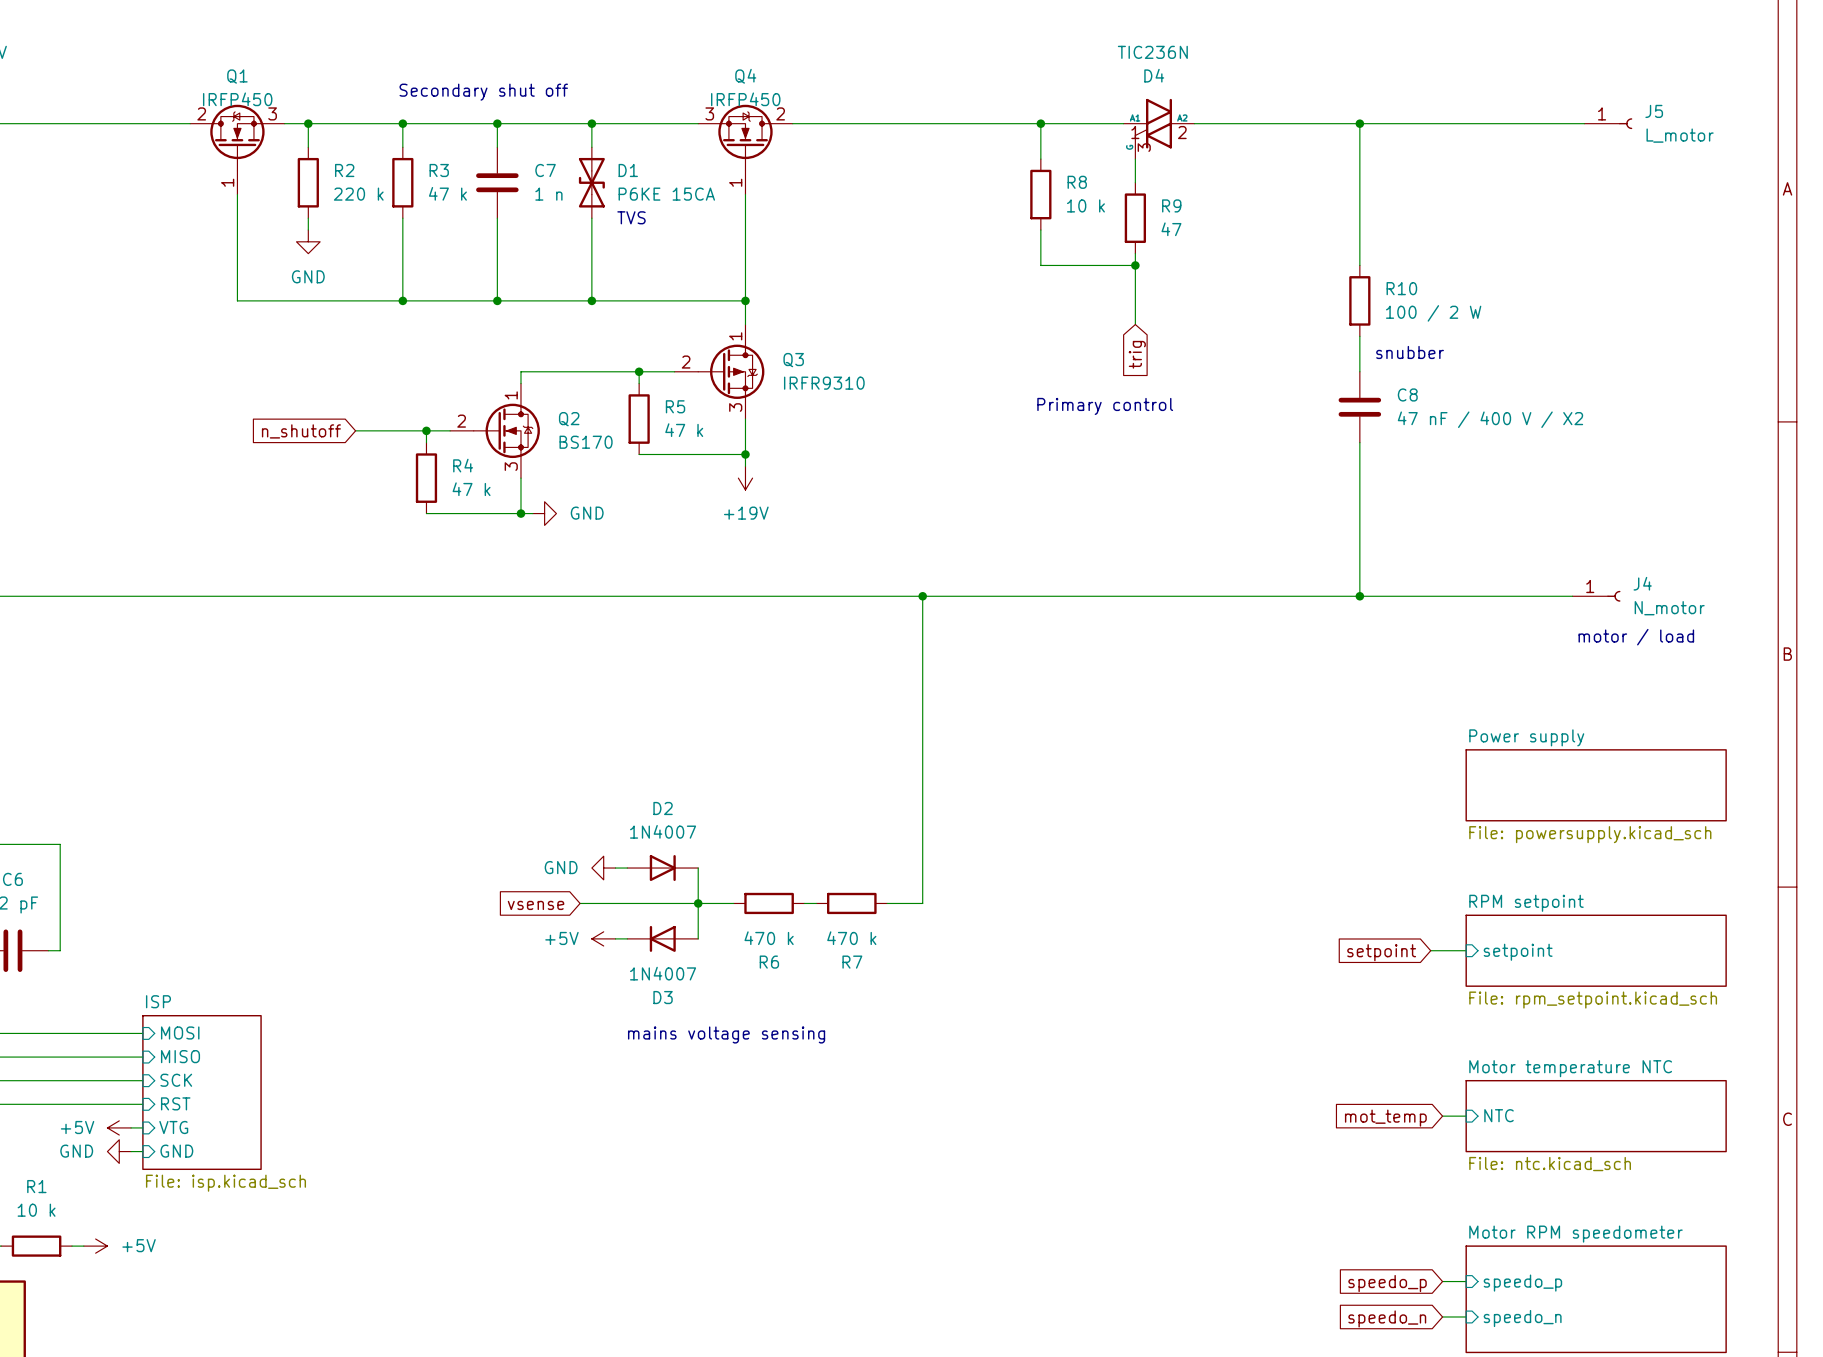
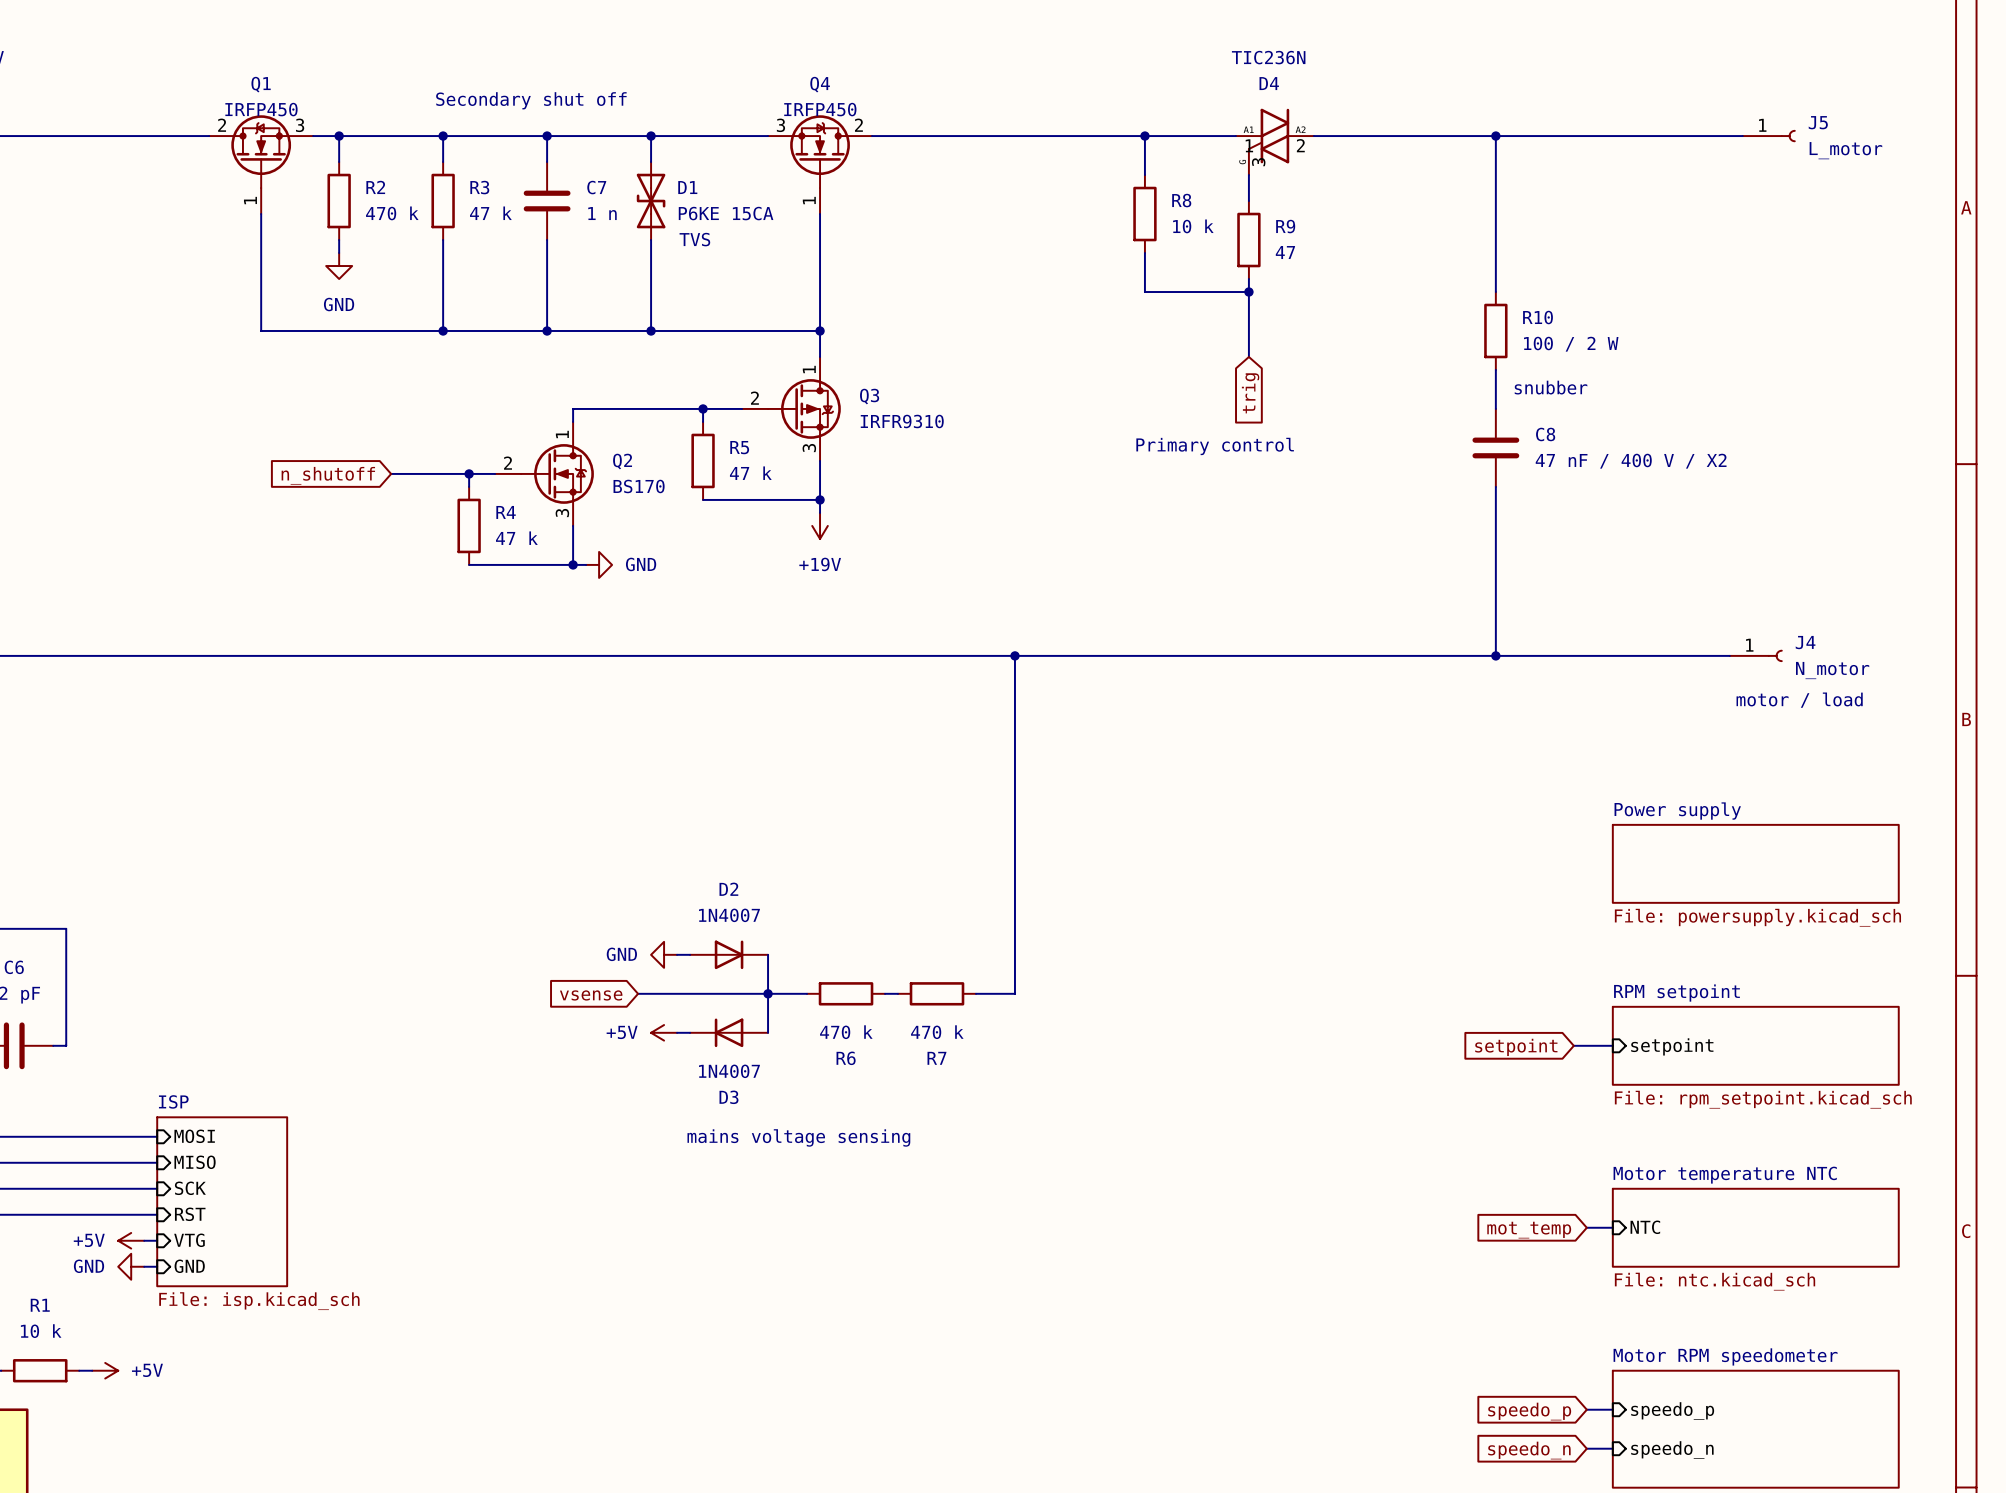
R2 value: 220 k (358, 194) -> 470 k (392, 213)

